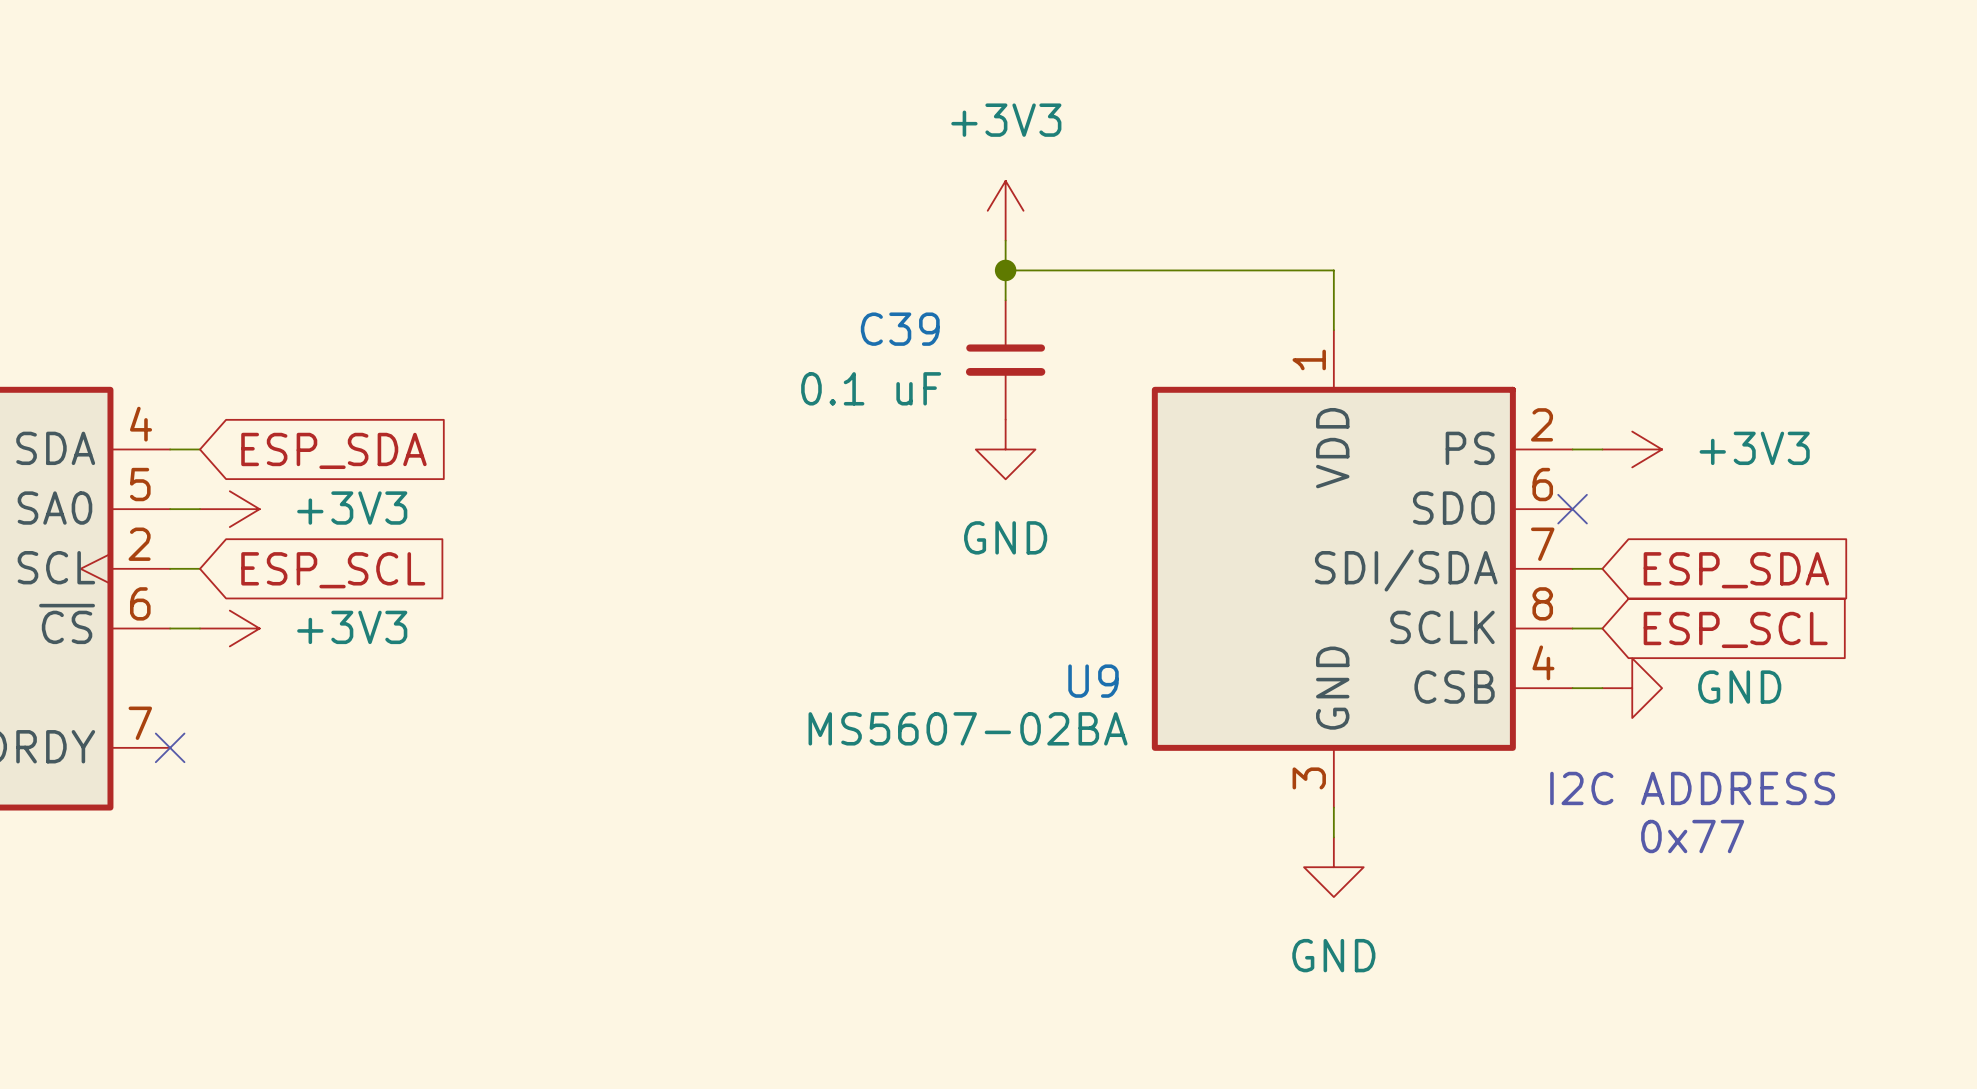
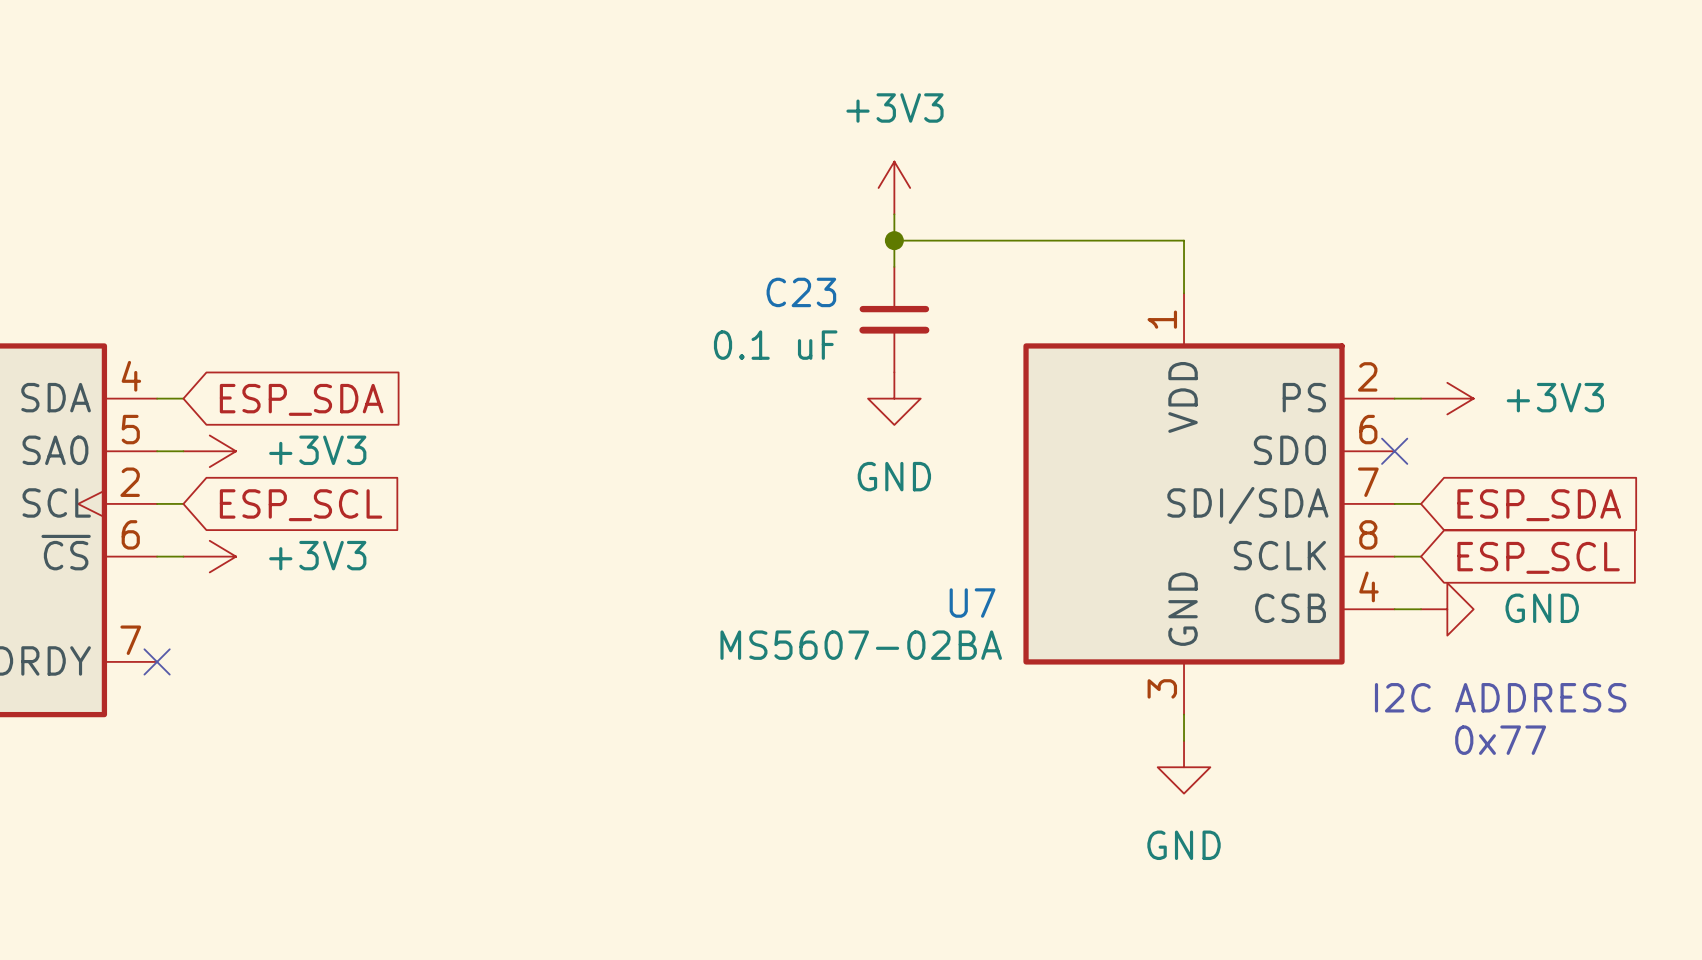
C39 name: C39 (900, 329) -> C23 (801, 292)
U9 name: U9 (1093, 681) -> U7 (972, 603)

